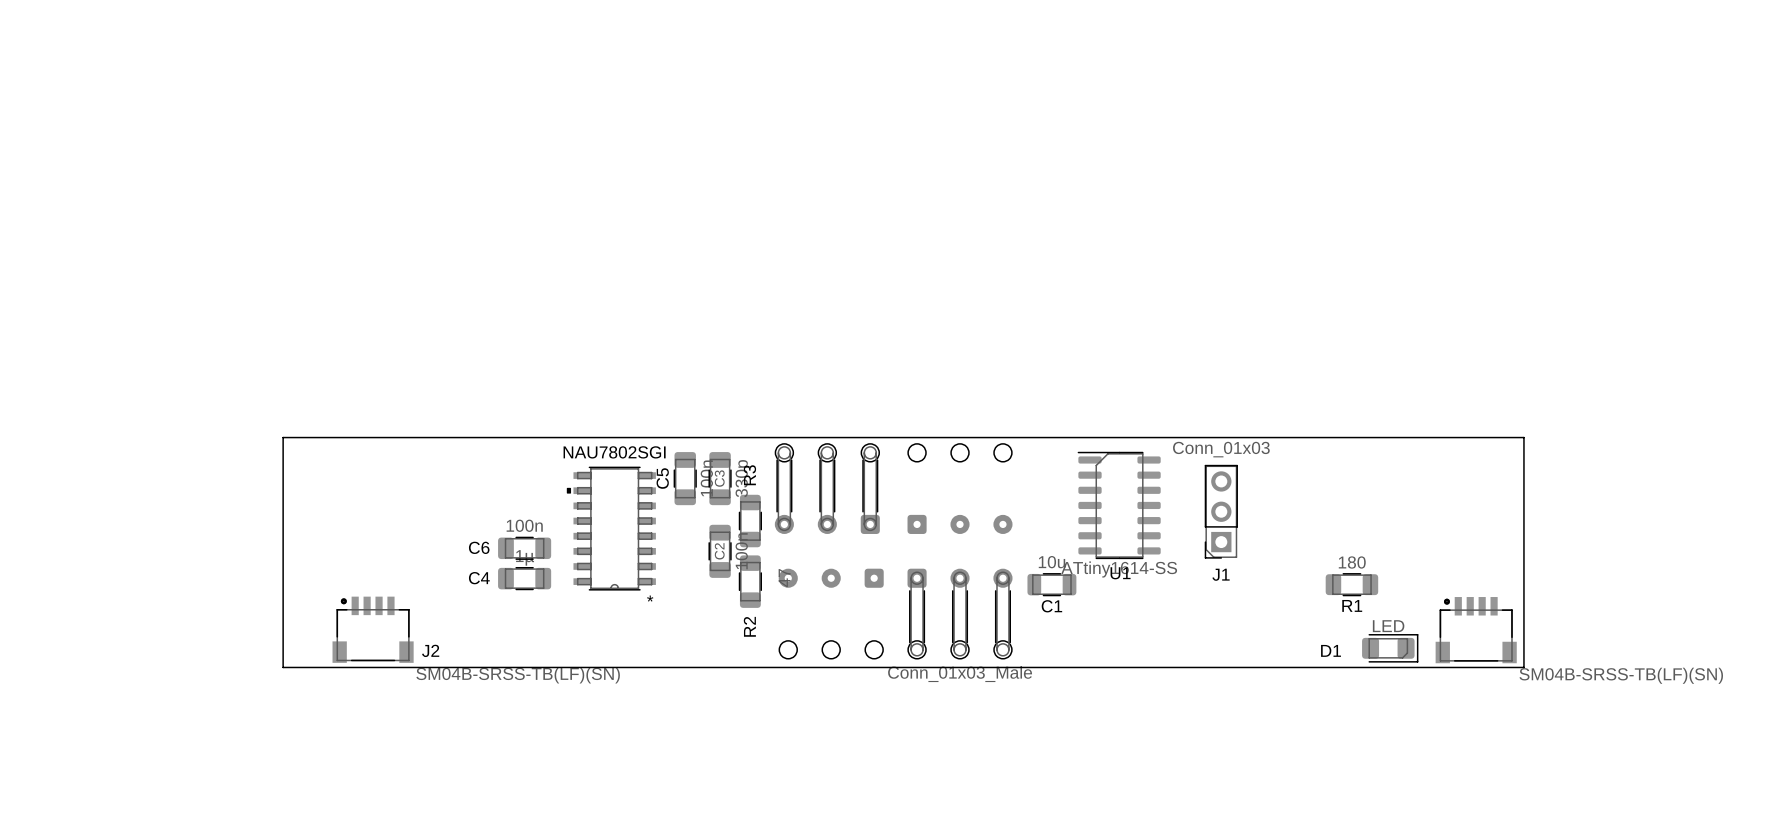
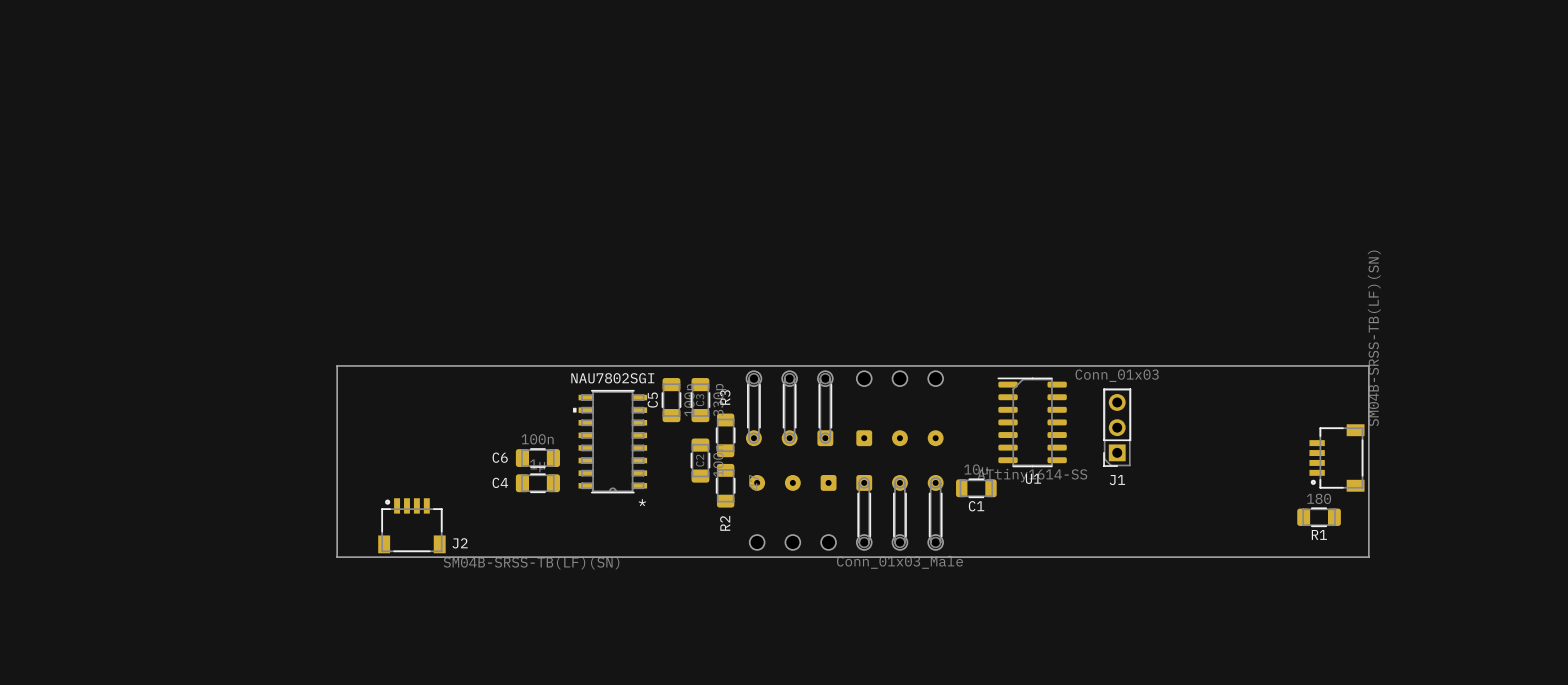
R1 position: (1351, 584) -> (1319, 517)
part rotation: 0° (1476, 630) -> 90° counterclockwise (1336, 457)
part position: (1476, 630) -> (1336, 457)
D1: LED (1390, 648) -> none

